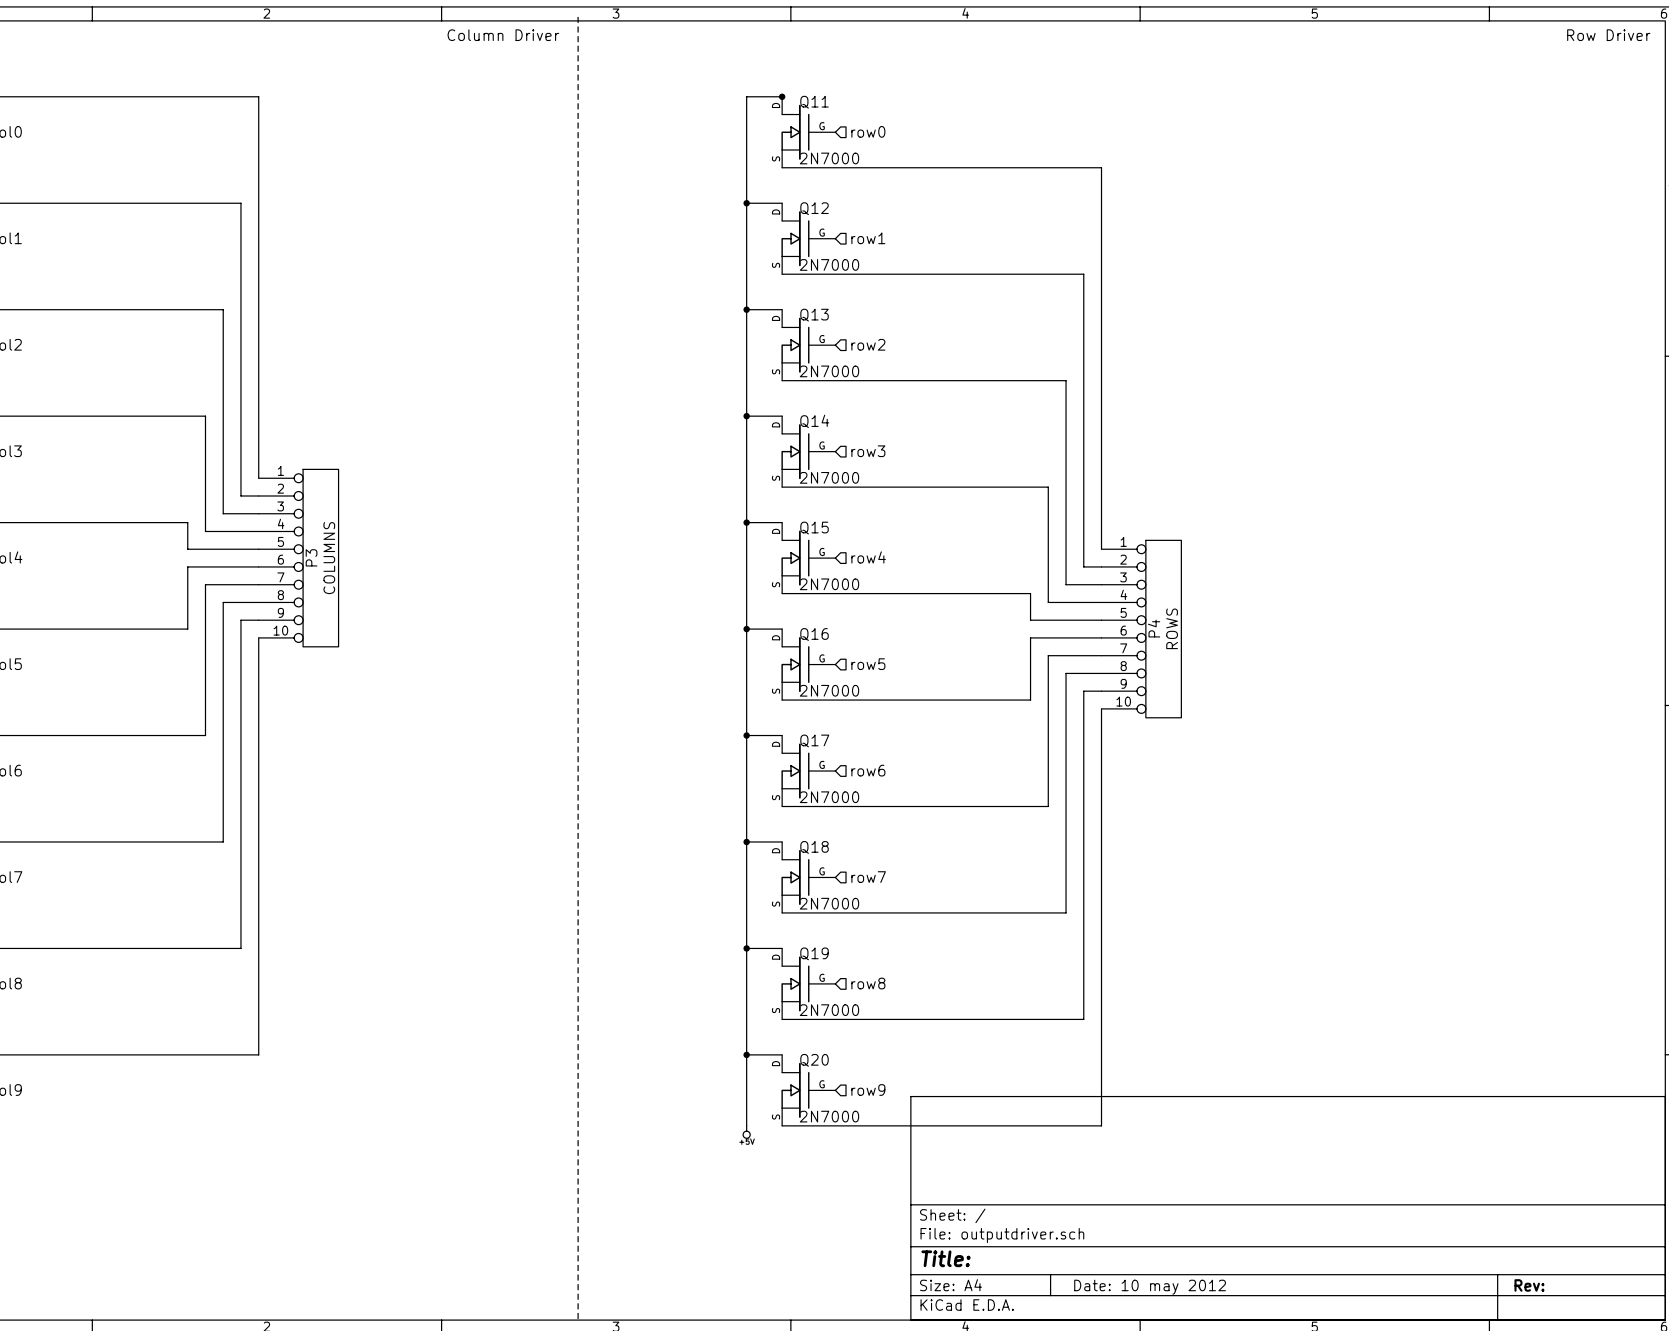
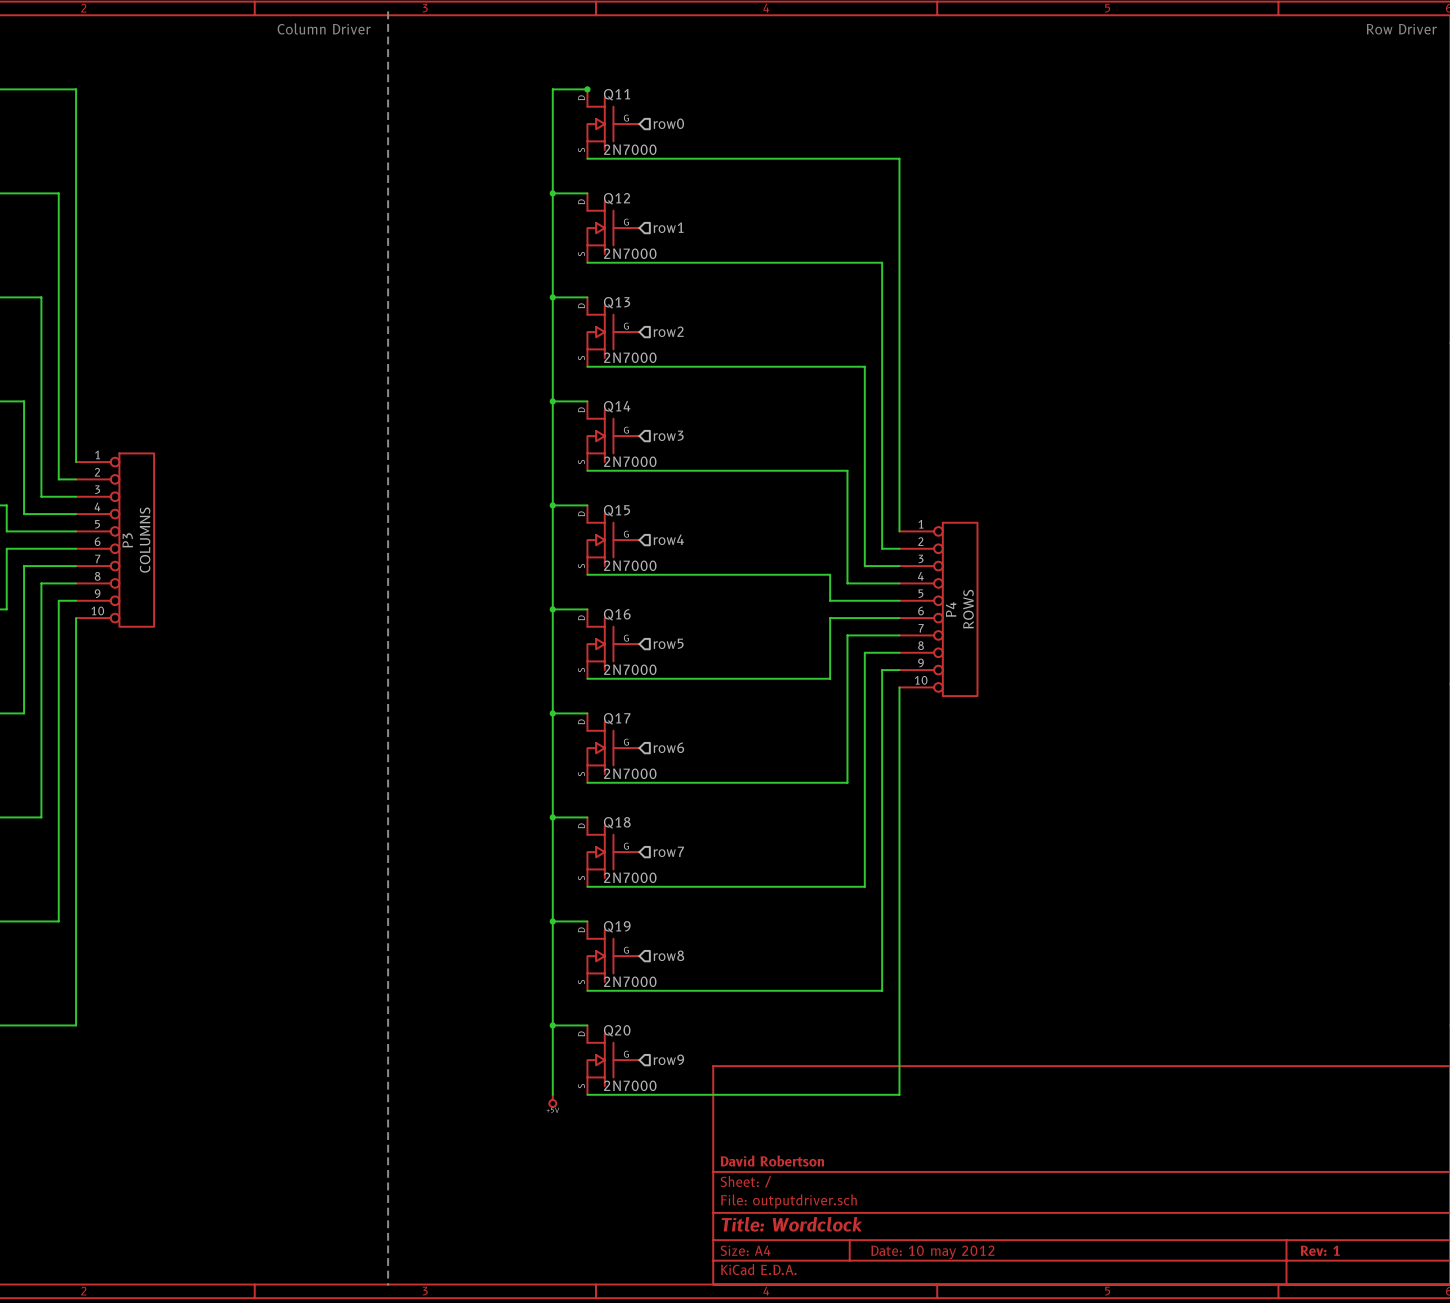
title block: none -> David Robertson (772, 1161)
title block: Title: (946, 1258) -> Title: Wordclock (791, 1224)
title block: Rev: (1529, 1285) -> Rev: 1 (1320, 1250)

